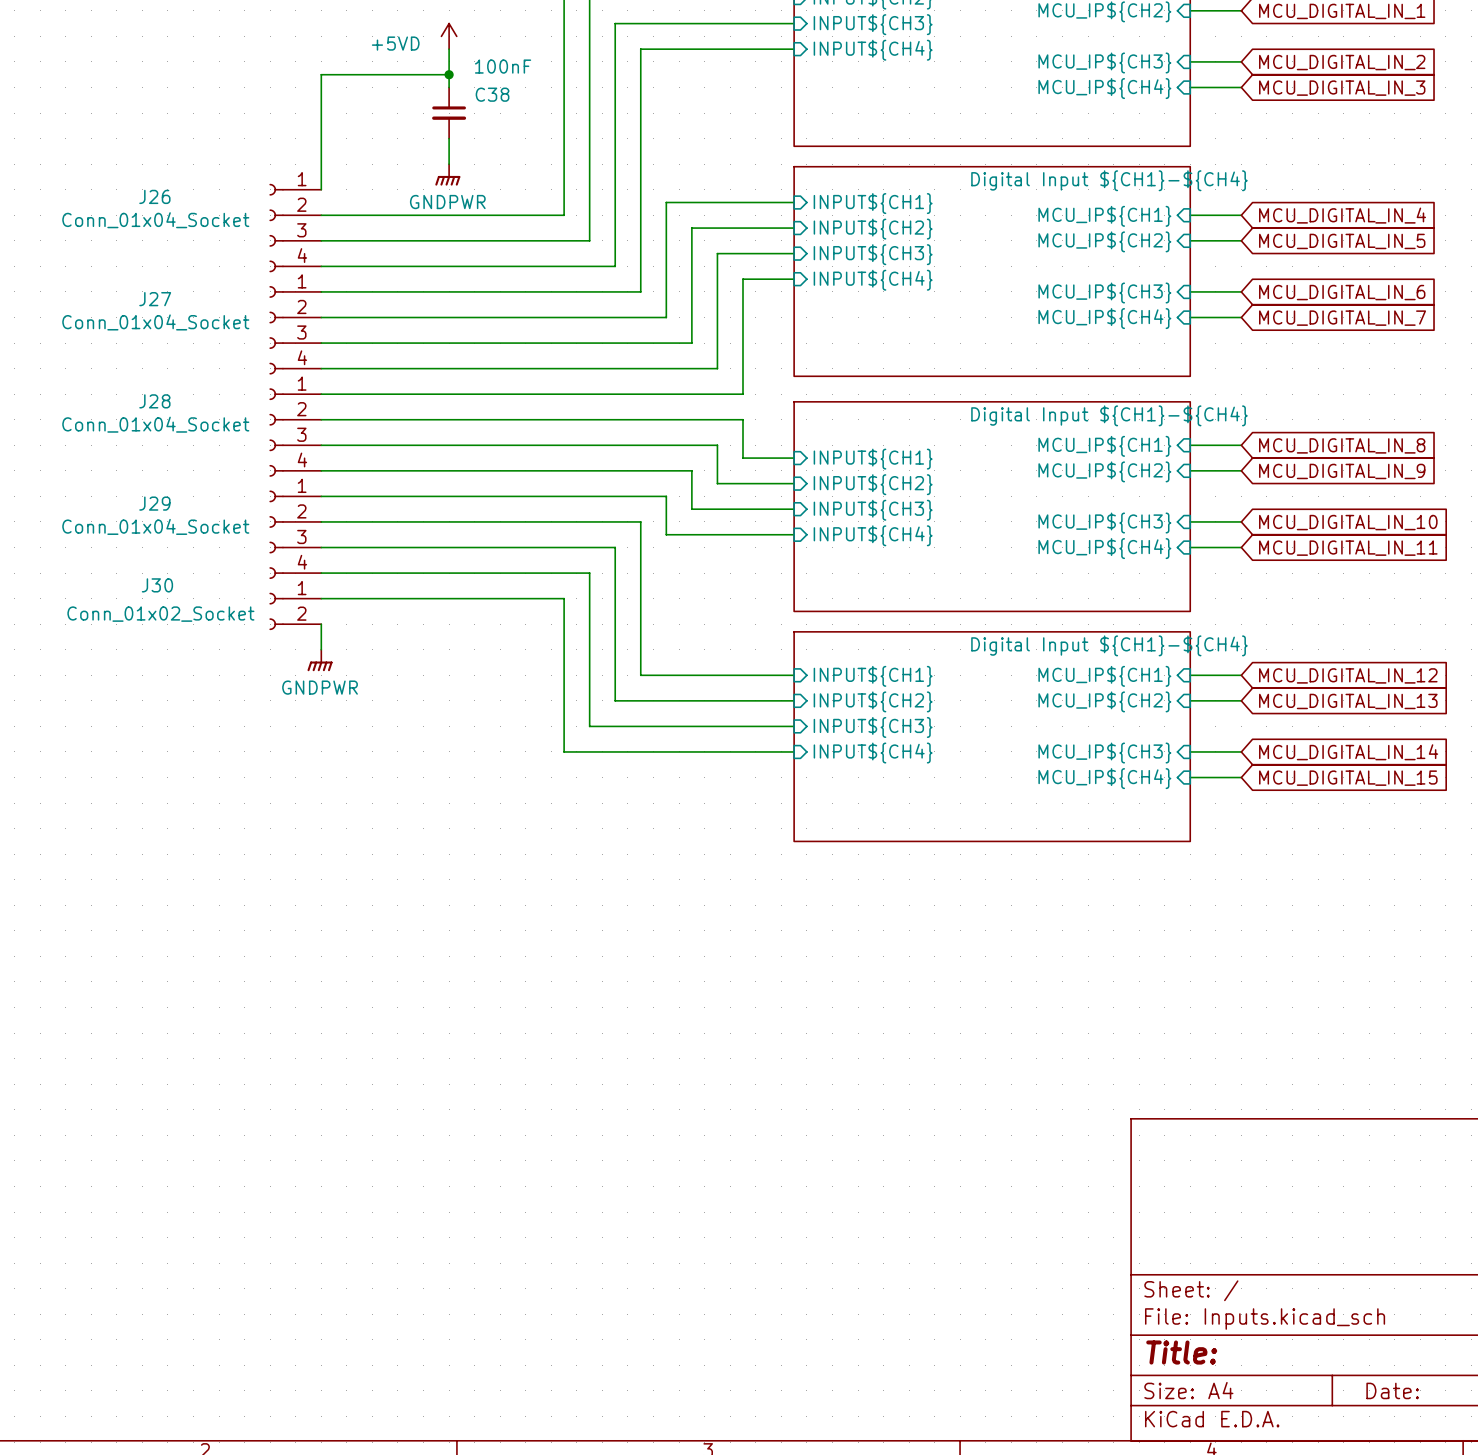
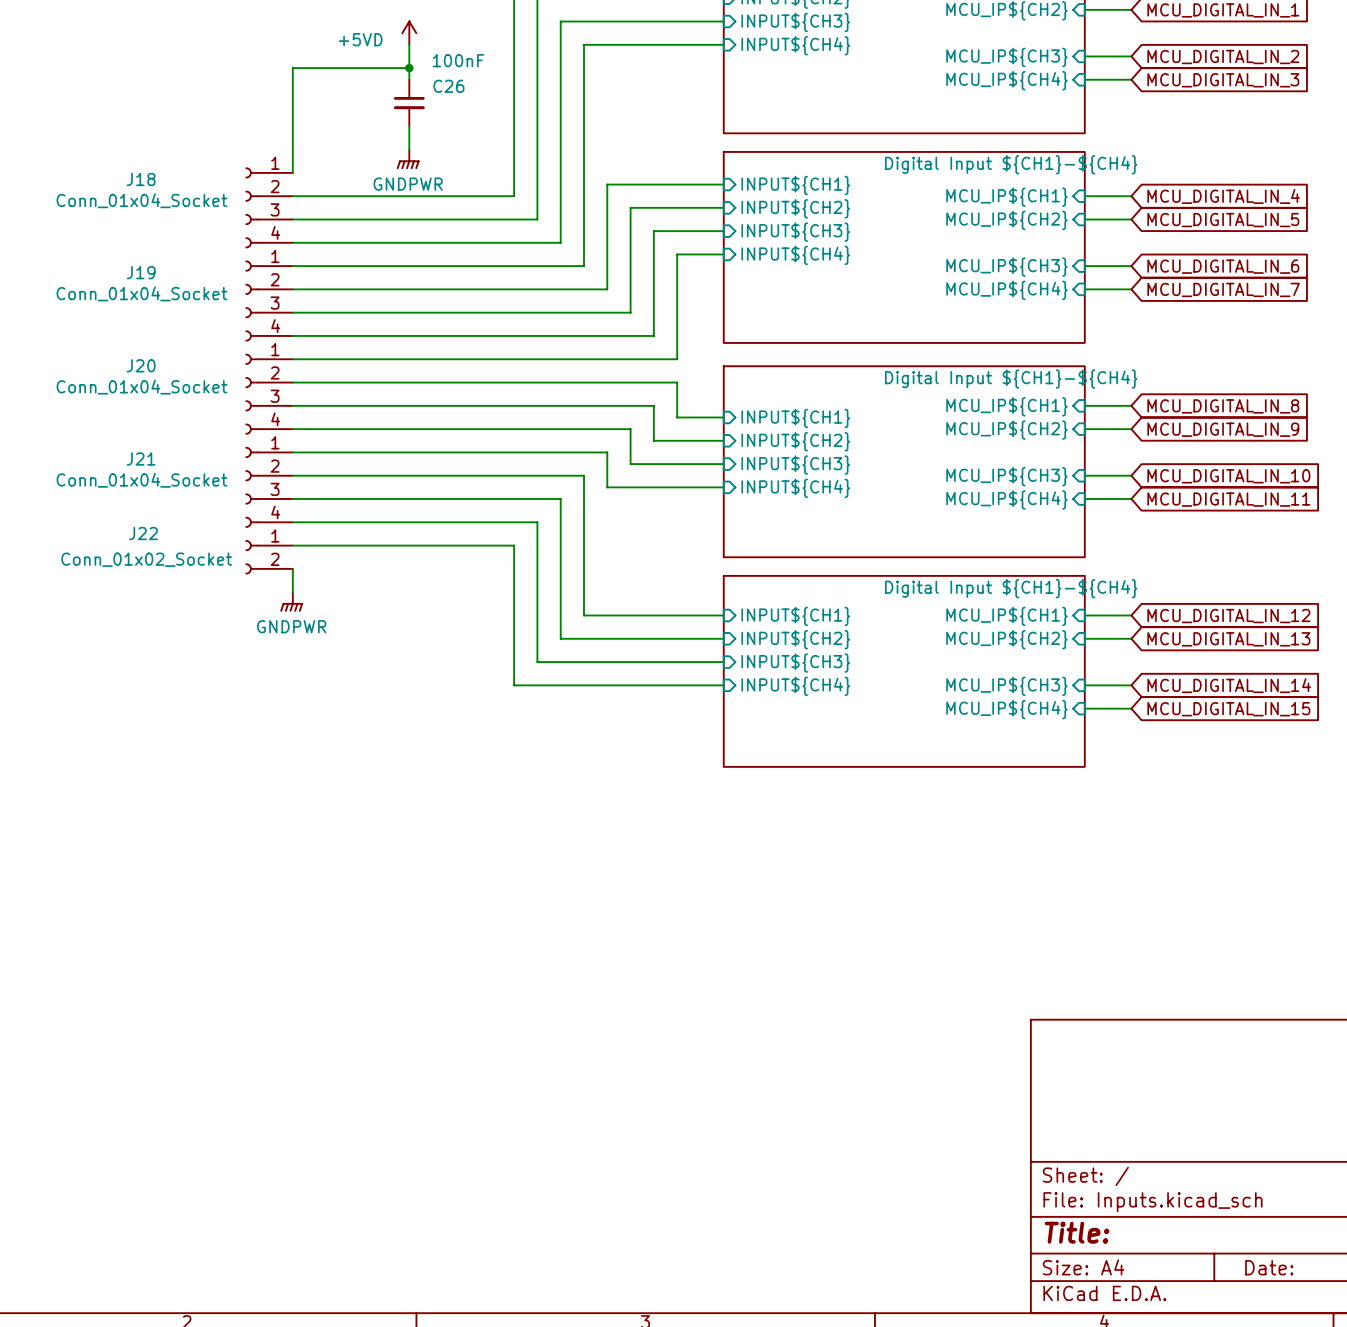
C38 name: C38 (492, 94) -> C26 (448, 86)
J26 name: J26 (154, 196) -> J18 (141, 179)
J27 name: J27 (155, 299) -> J19 (141, 272)
J28 name: J28 (154, 401) -> J20 (141, 365)
J29 name: J29 (154, 503) -> J21 (141, 458)
J30 name: J30 (157, 585) -> J22 (143, 533)

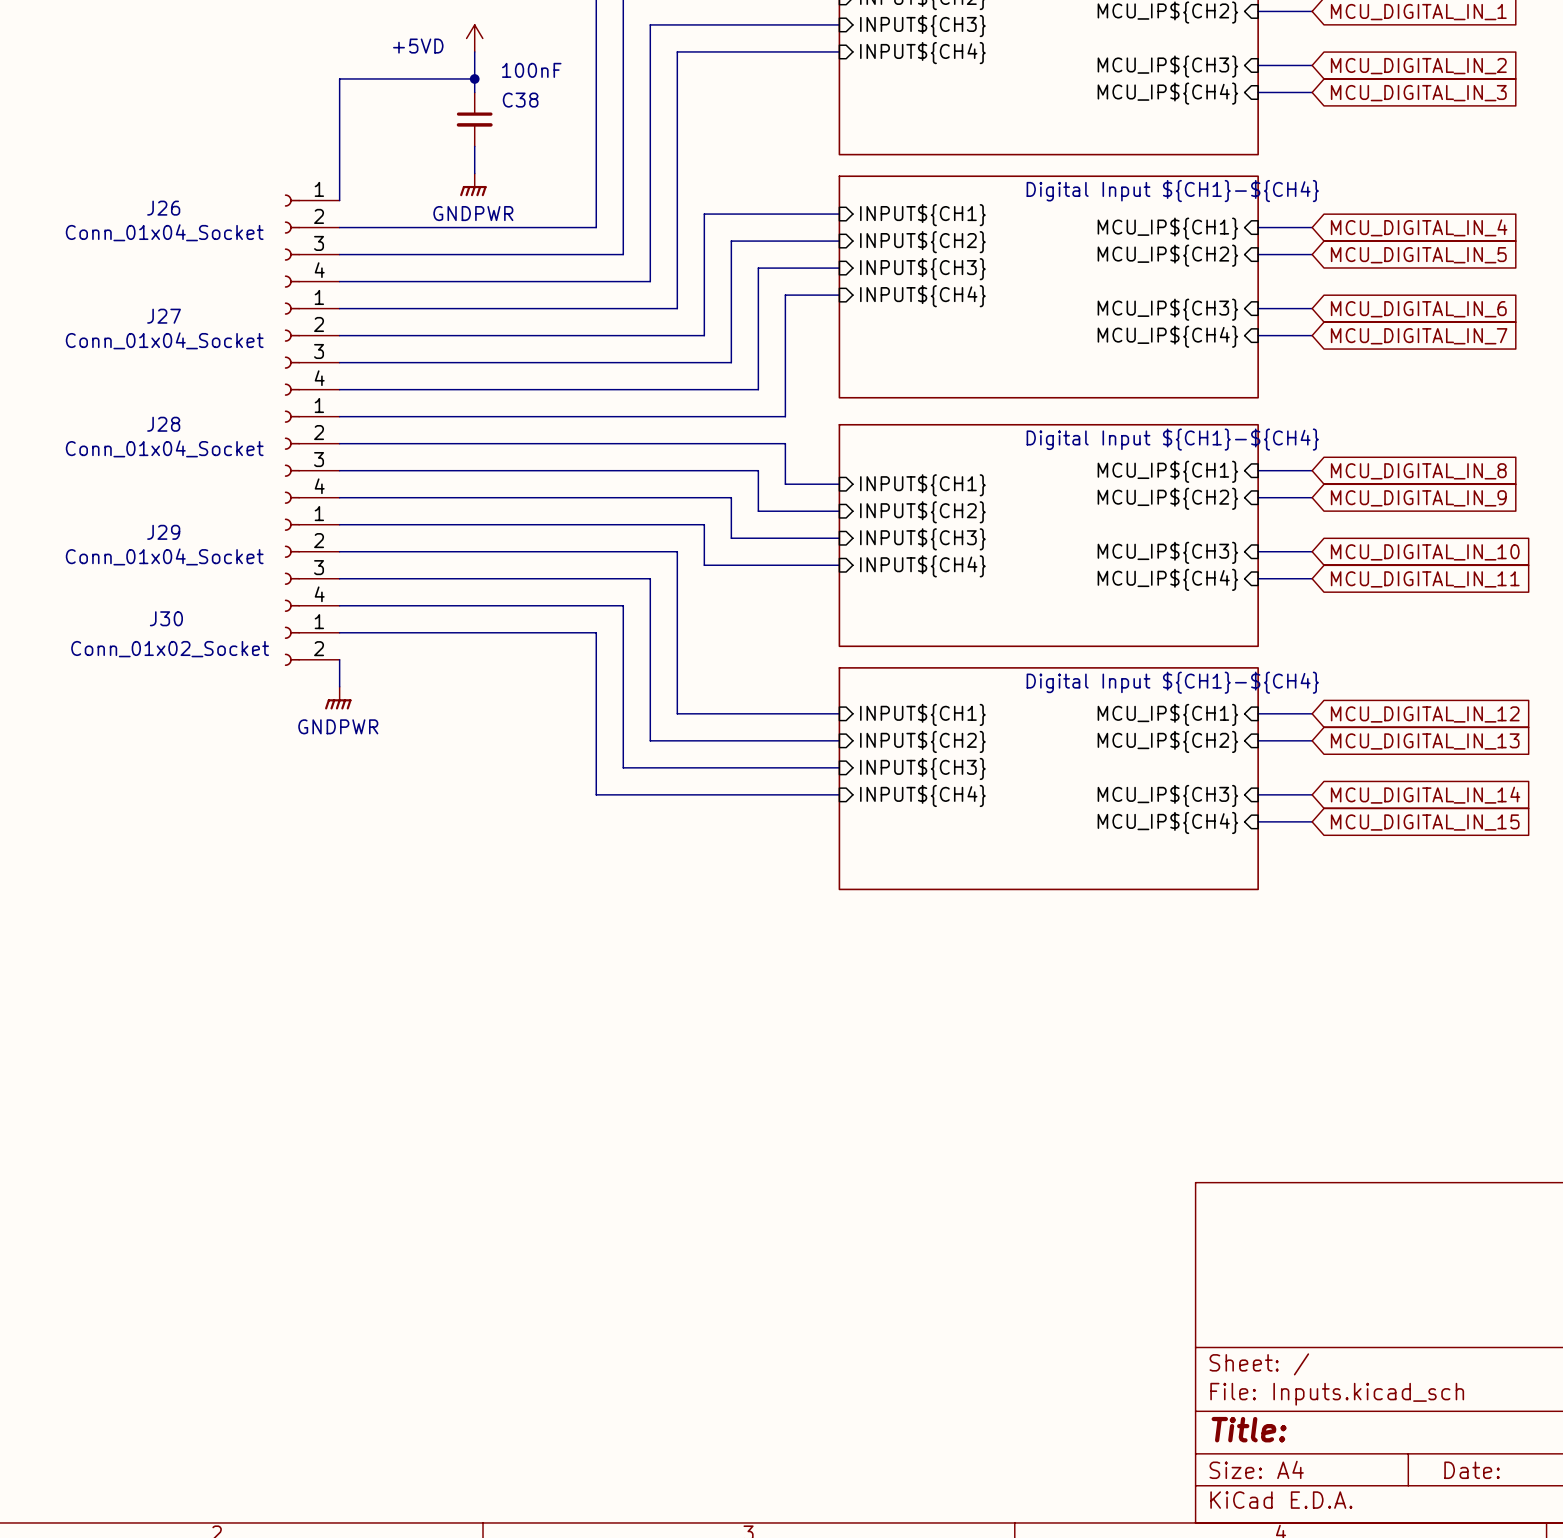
C26 name: C26 (448, 86) -> C38 (520, 100)
J18 name: J18 (141, 179) -> J26 (163, 208)
J19 name: J19 (141, 272) -> J27 (164, 316)
J20 name: J20 (141, 365) -> J28 (163, 424)
J21 name: J21 (141, 458) -> J29 (163, 532)
J22 name: J22 (143, 533) -> J30 (166, 618)

